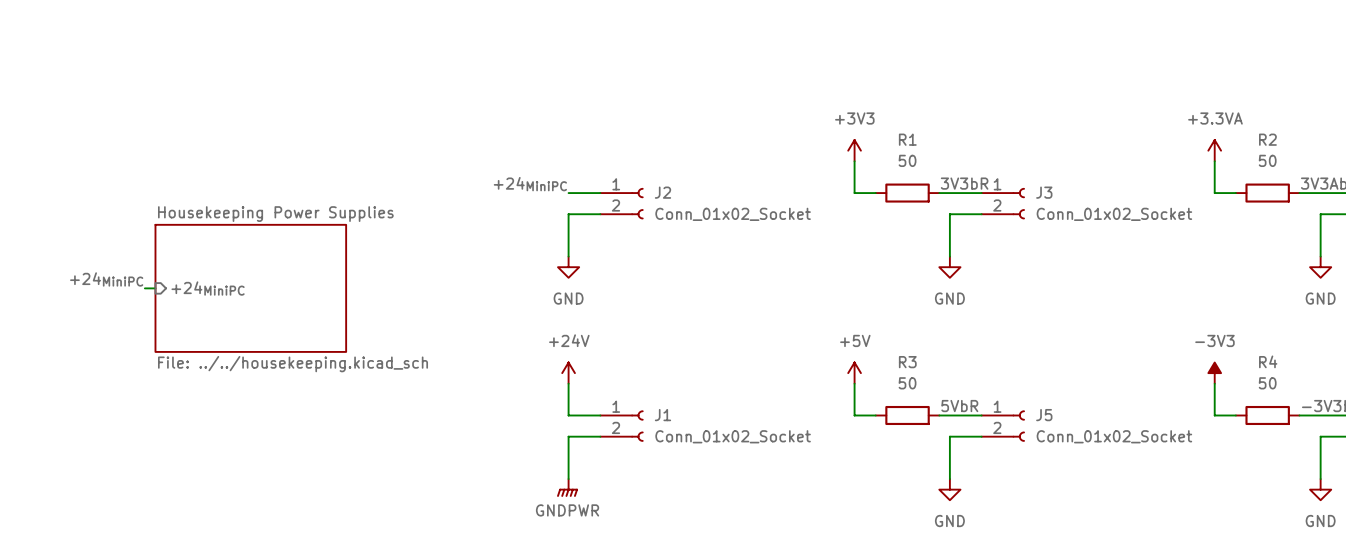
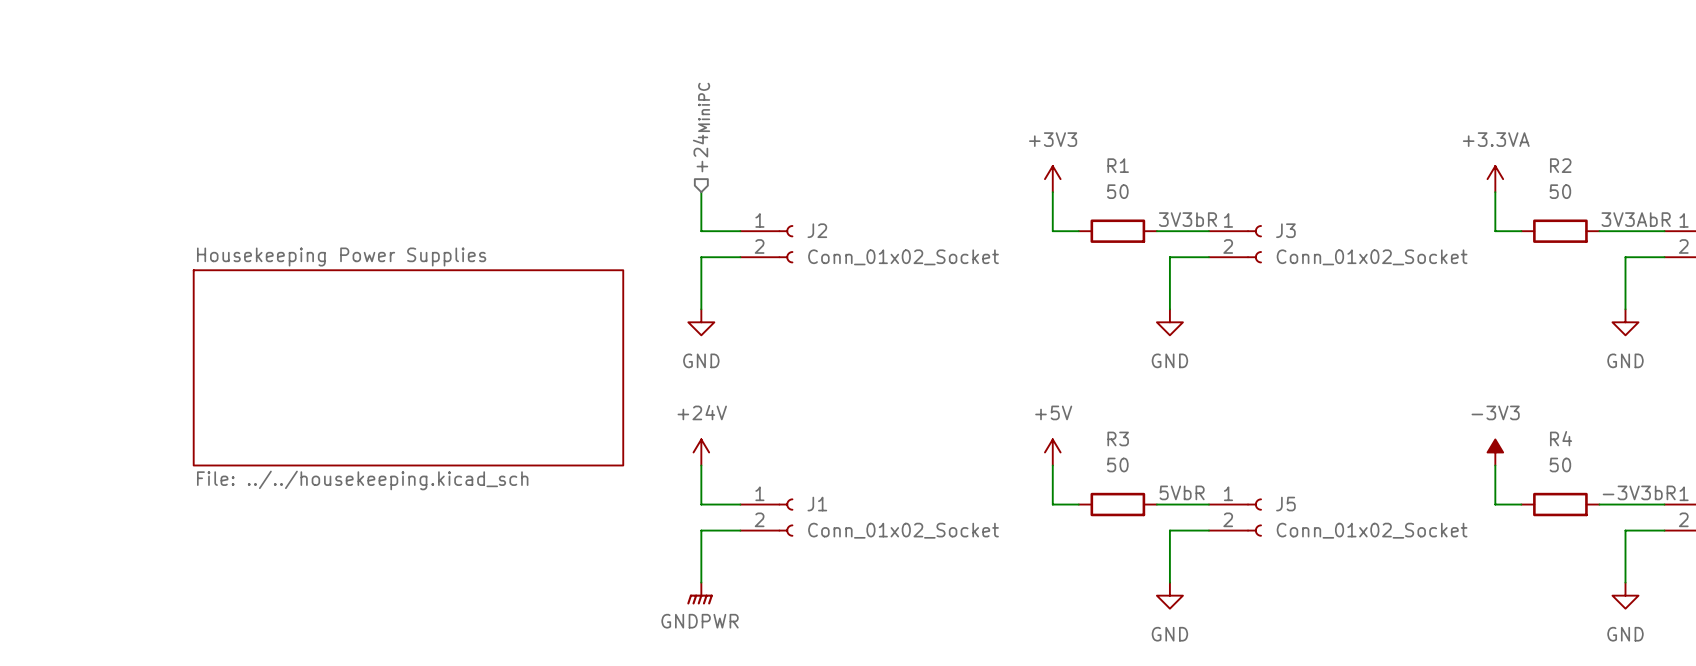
hierarchical label: none -> +24MiniPC (701, 127)
wire: none -> (701, 192) (701, 231)
label: +24MiniPC (530, 184) -> none
label: +24MiniPC (106, 279) -> none
wire: (144, 288) (155, 288) -> none
sheet pin: +24MiniPC (208, 288) -> none
sheet Housekeeping Power Supplies: File: ../../housekeeping.kicad_sch (250, 288) -> none
sheet Housekeeping Power Supplies: none -> File: ../../housekeeping.kicad_sch (408, 367)

